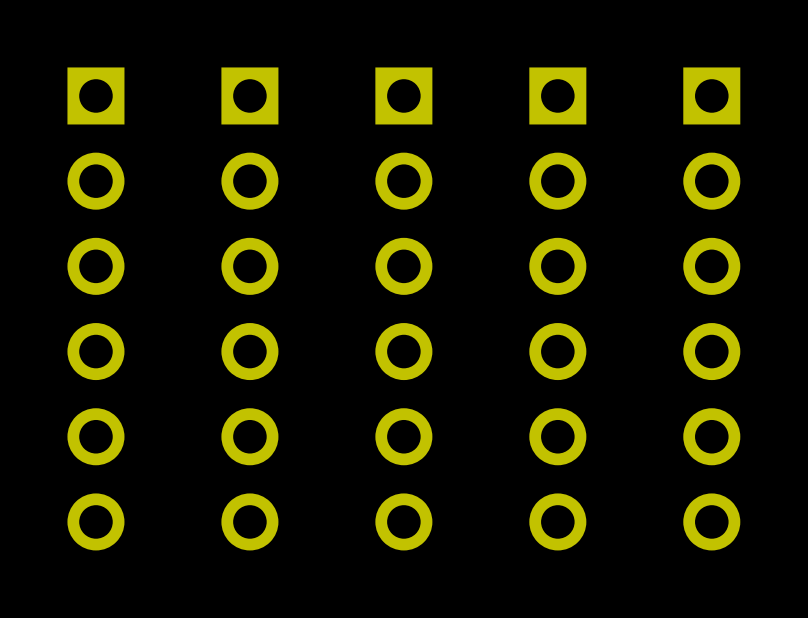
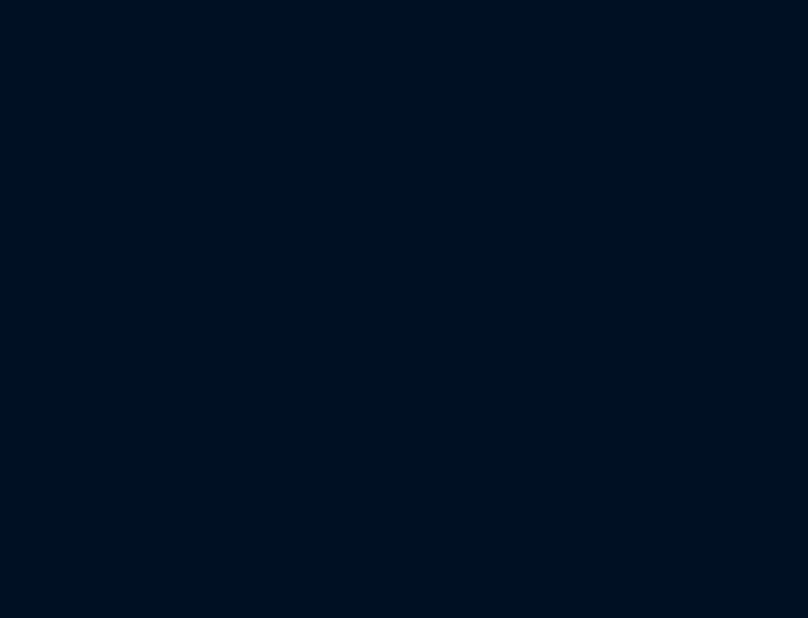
part: (95, 308) -> none
part: (249, 308) -> none
part: (403, 308) -> none
part: (557, 308) -> none
part: (711, 308) -> none

